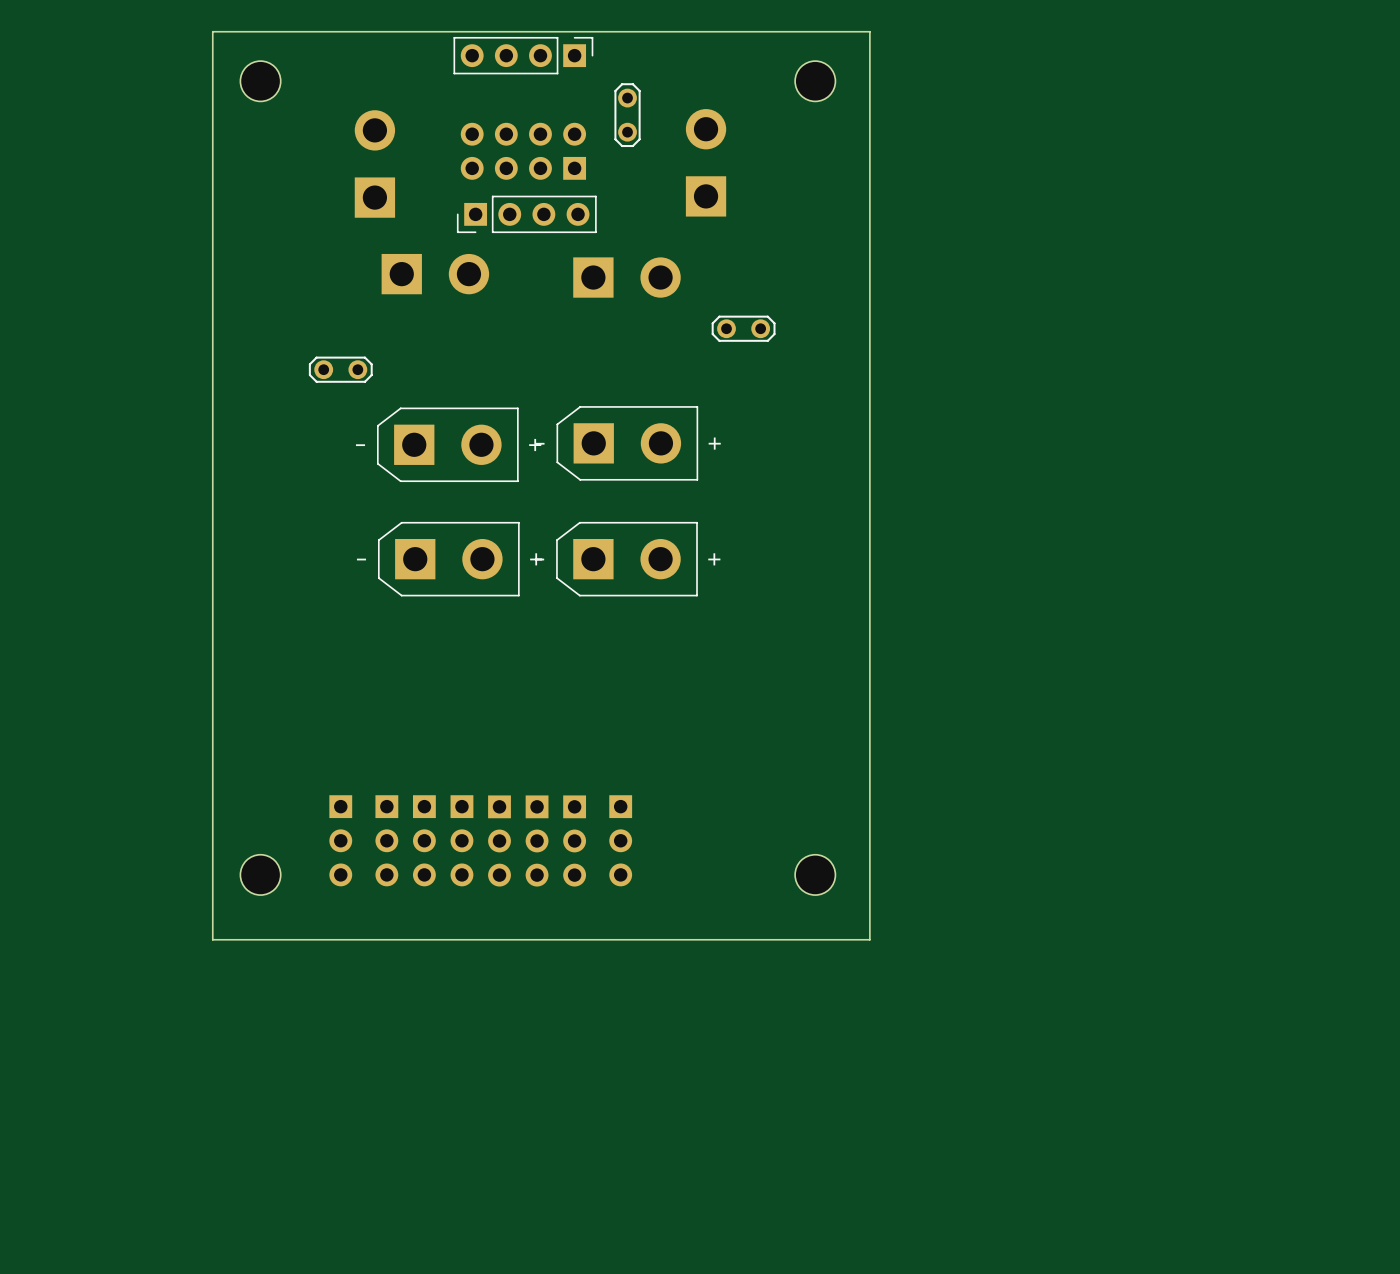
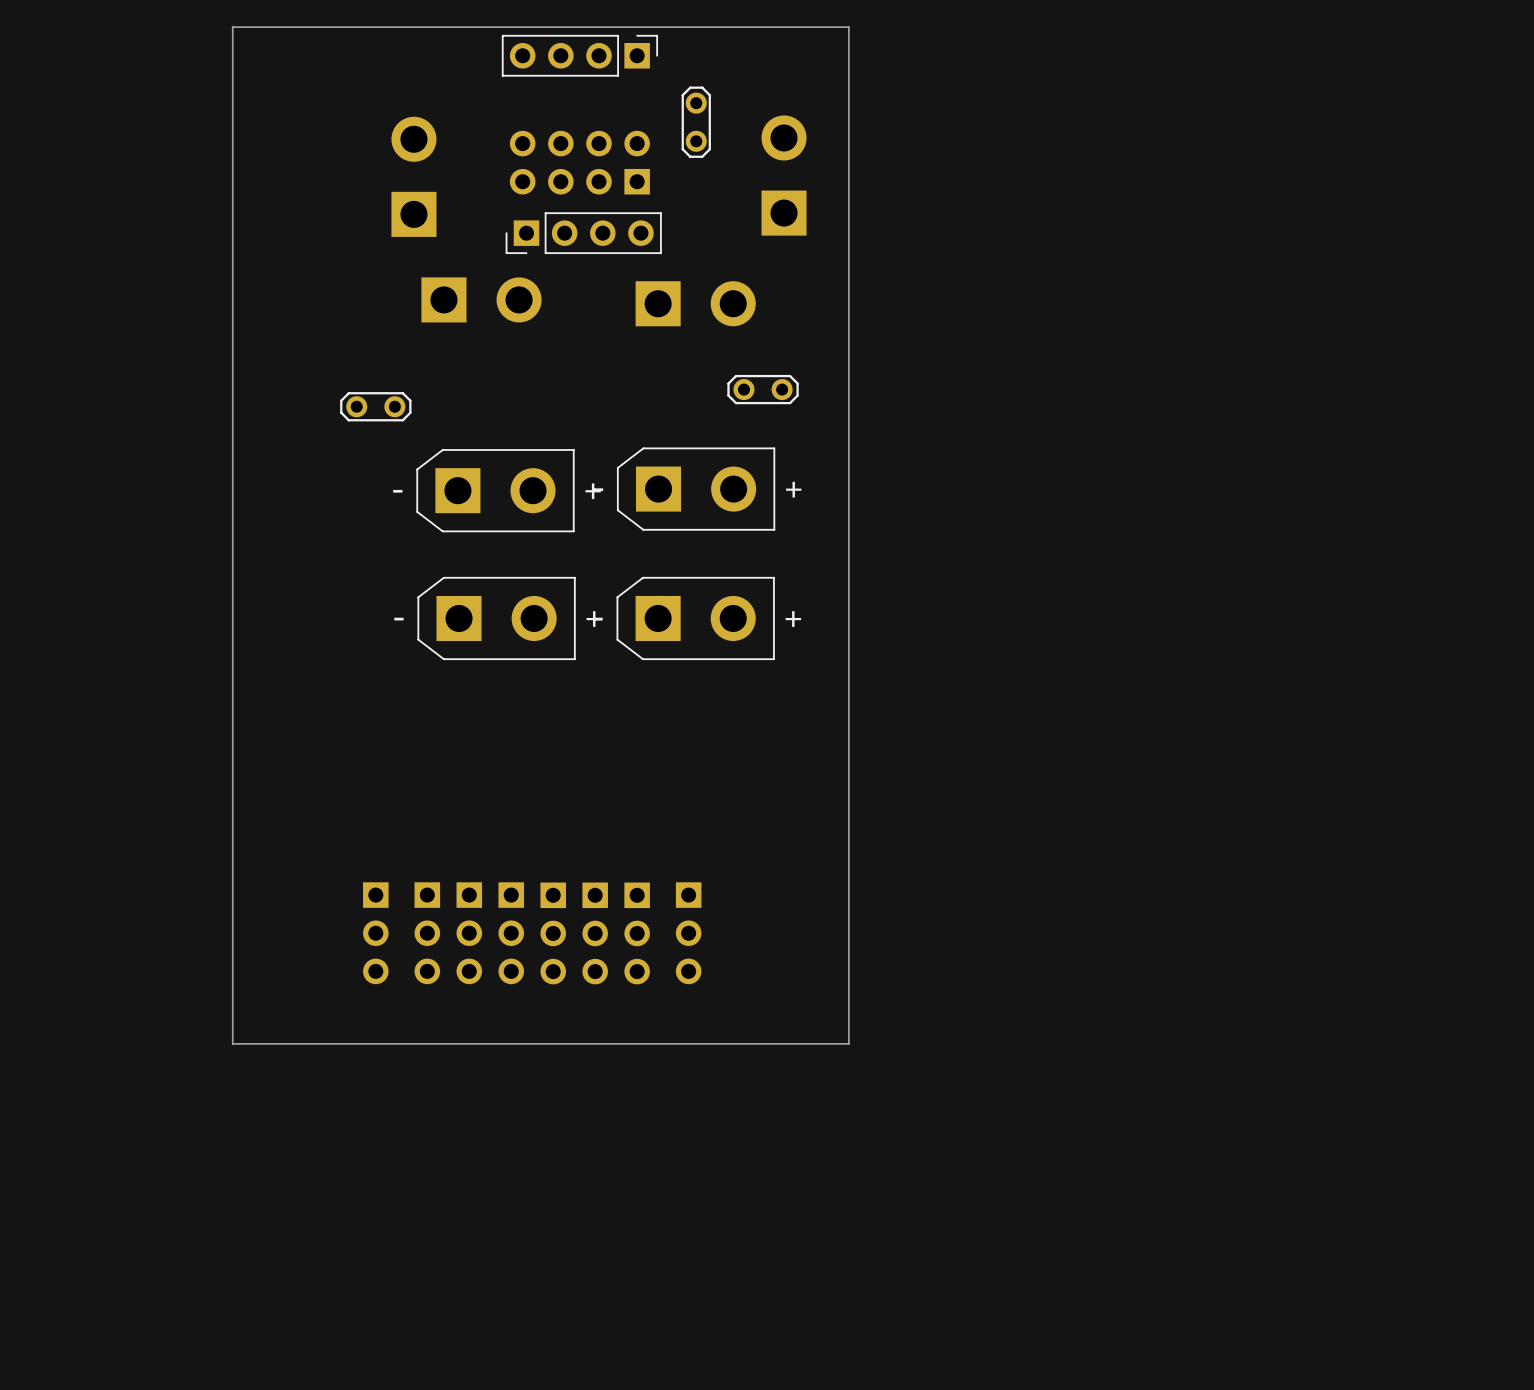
board edge: (212, 31) (869, 31) (869, 939) (764, 939) -> (232, 29) (232, 27) (848, 27) (848, 1043)
part: (260, 81) -> none
part: (815, 81) -> none
part position: (743, 328) -> (763, 389)
part: (260, 874) -> none
part: (815, 874) -> none

